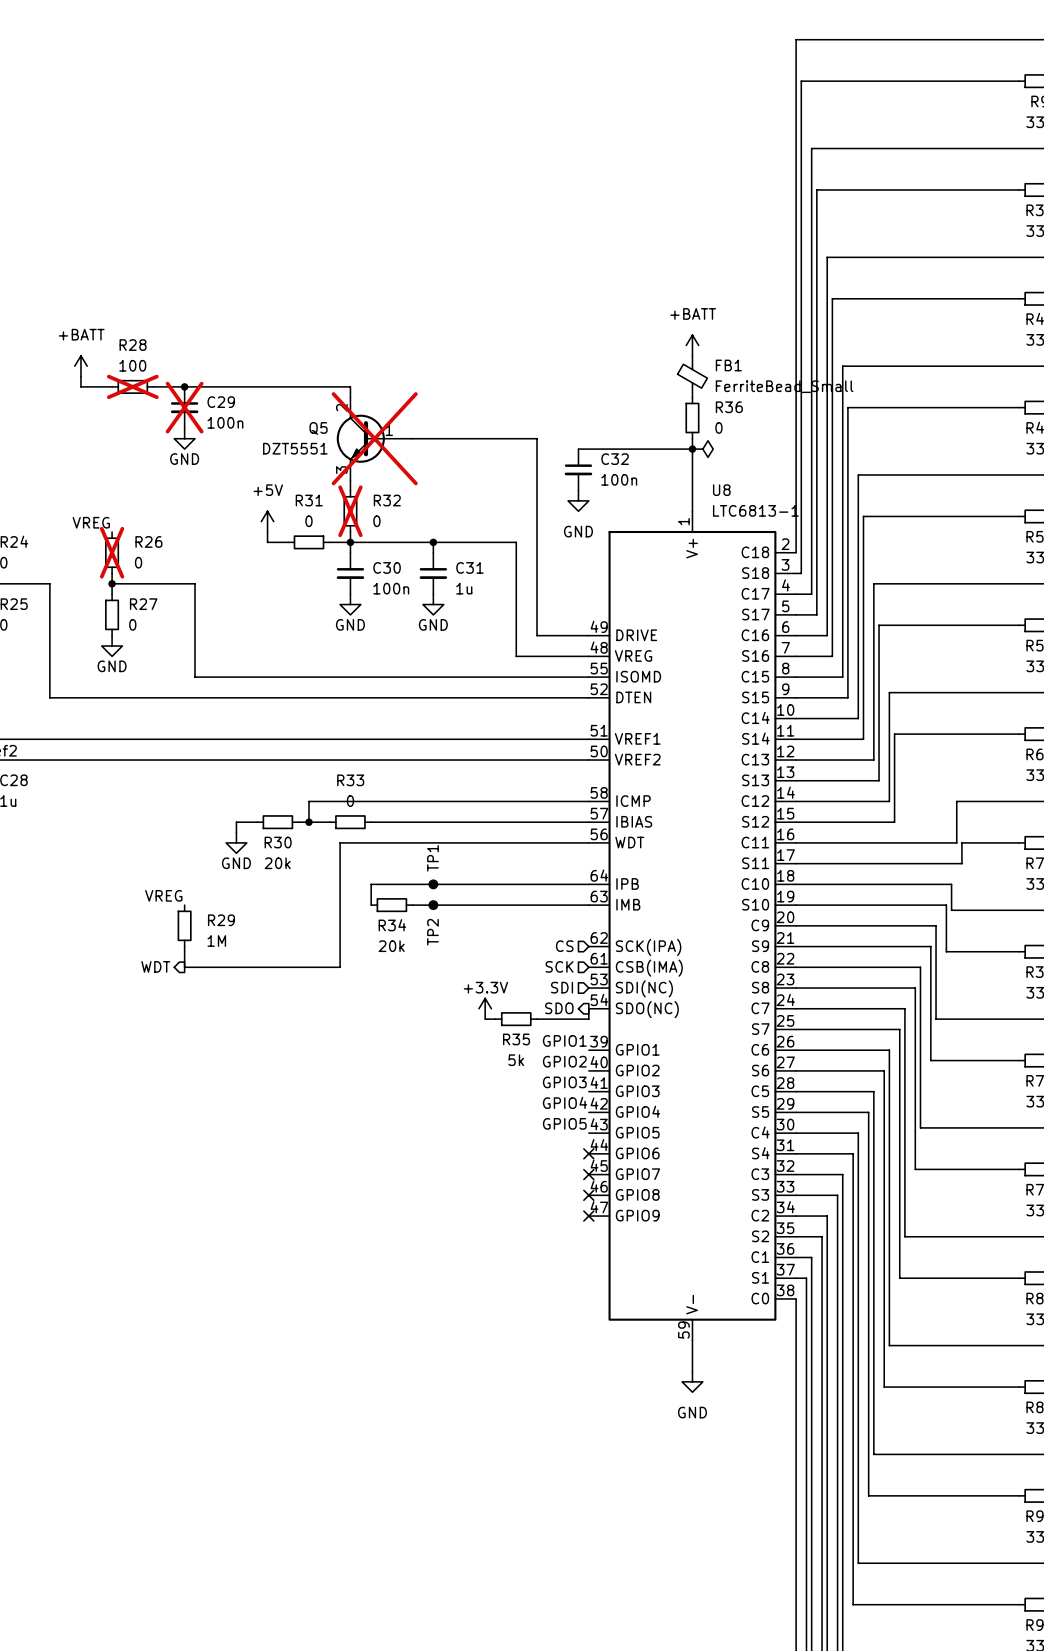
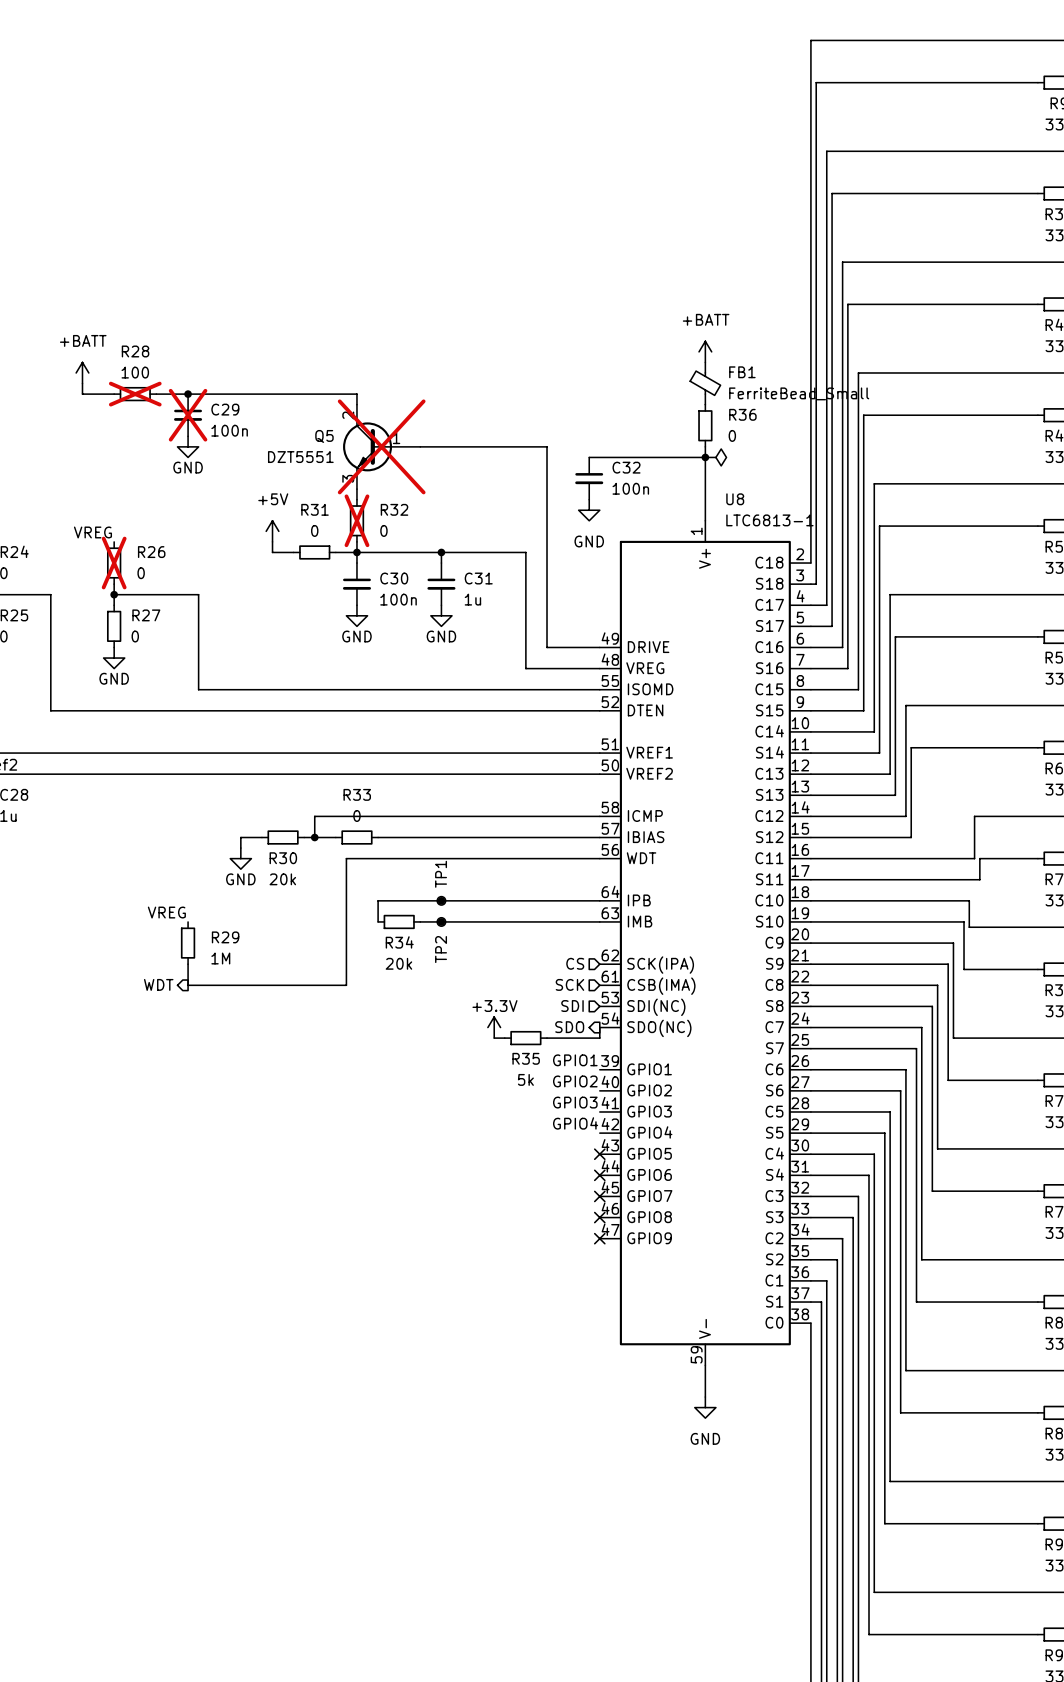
label: GPIO5 (564, 1123) -> none
no-connect mark: none -> (599, 1154)

